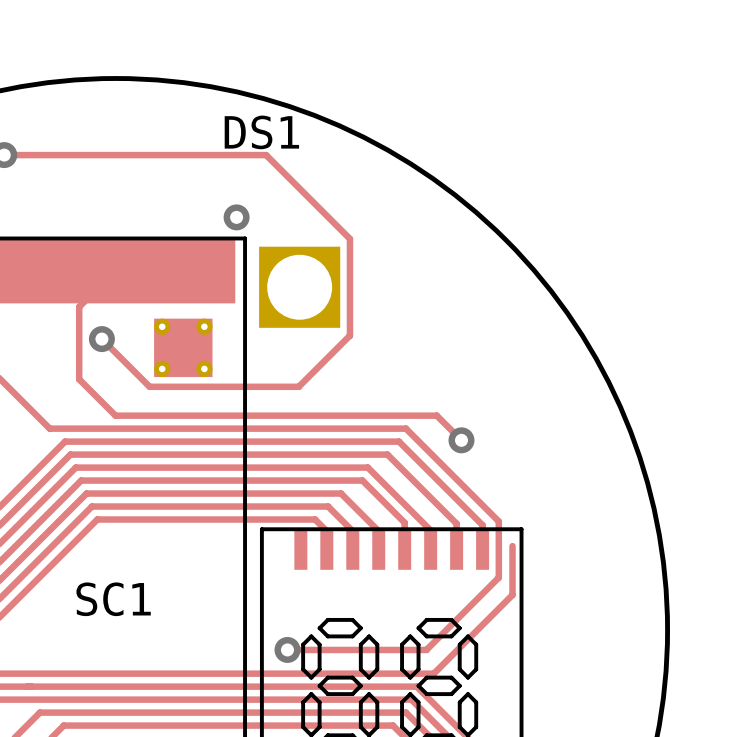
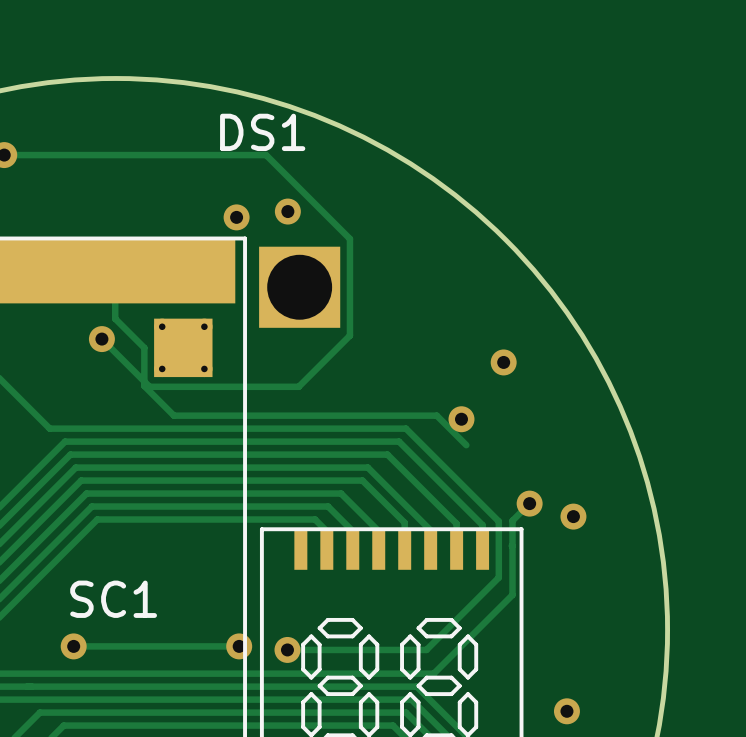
via: none -> (287, 211)
track: (115, 270) (79, 306) (79, 379) (115, 415) (173, 415) -> (115, 270) (115, 318) (144, 347) (144, 386) (173, 415)
via: none -> (503, 362)
via position: (461, 440) -> (461, 419)
track: none -> (529, 503) (512, 520) (512, 546)
via: none -> (529, 503)
via: none -> (573, 516)
track: none -> (73, 646) (239, 646)
via: none -> (73, 646)
via: none -> (239, 646)
via: none -> (566, 711)

